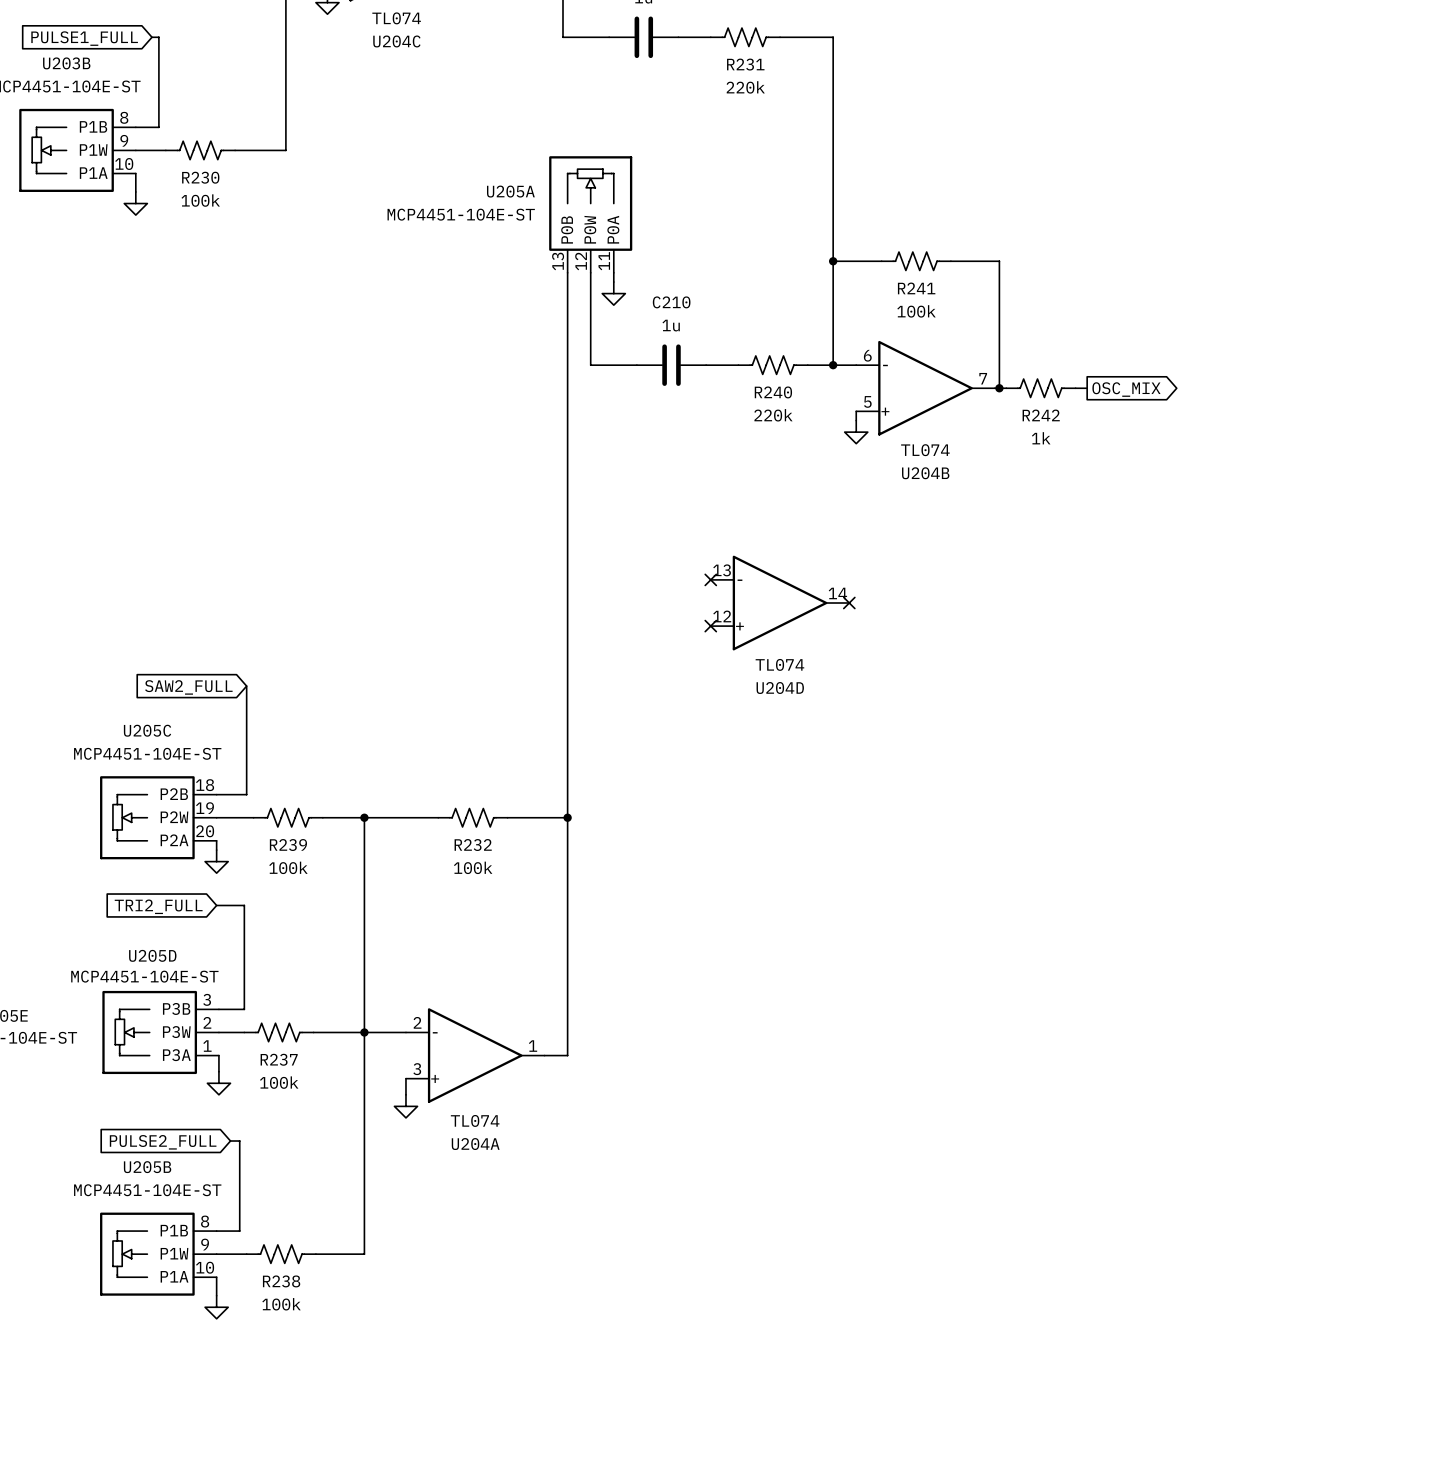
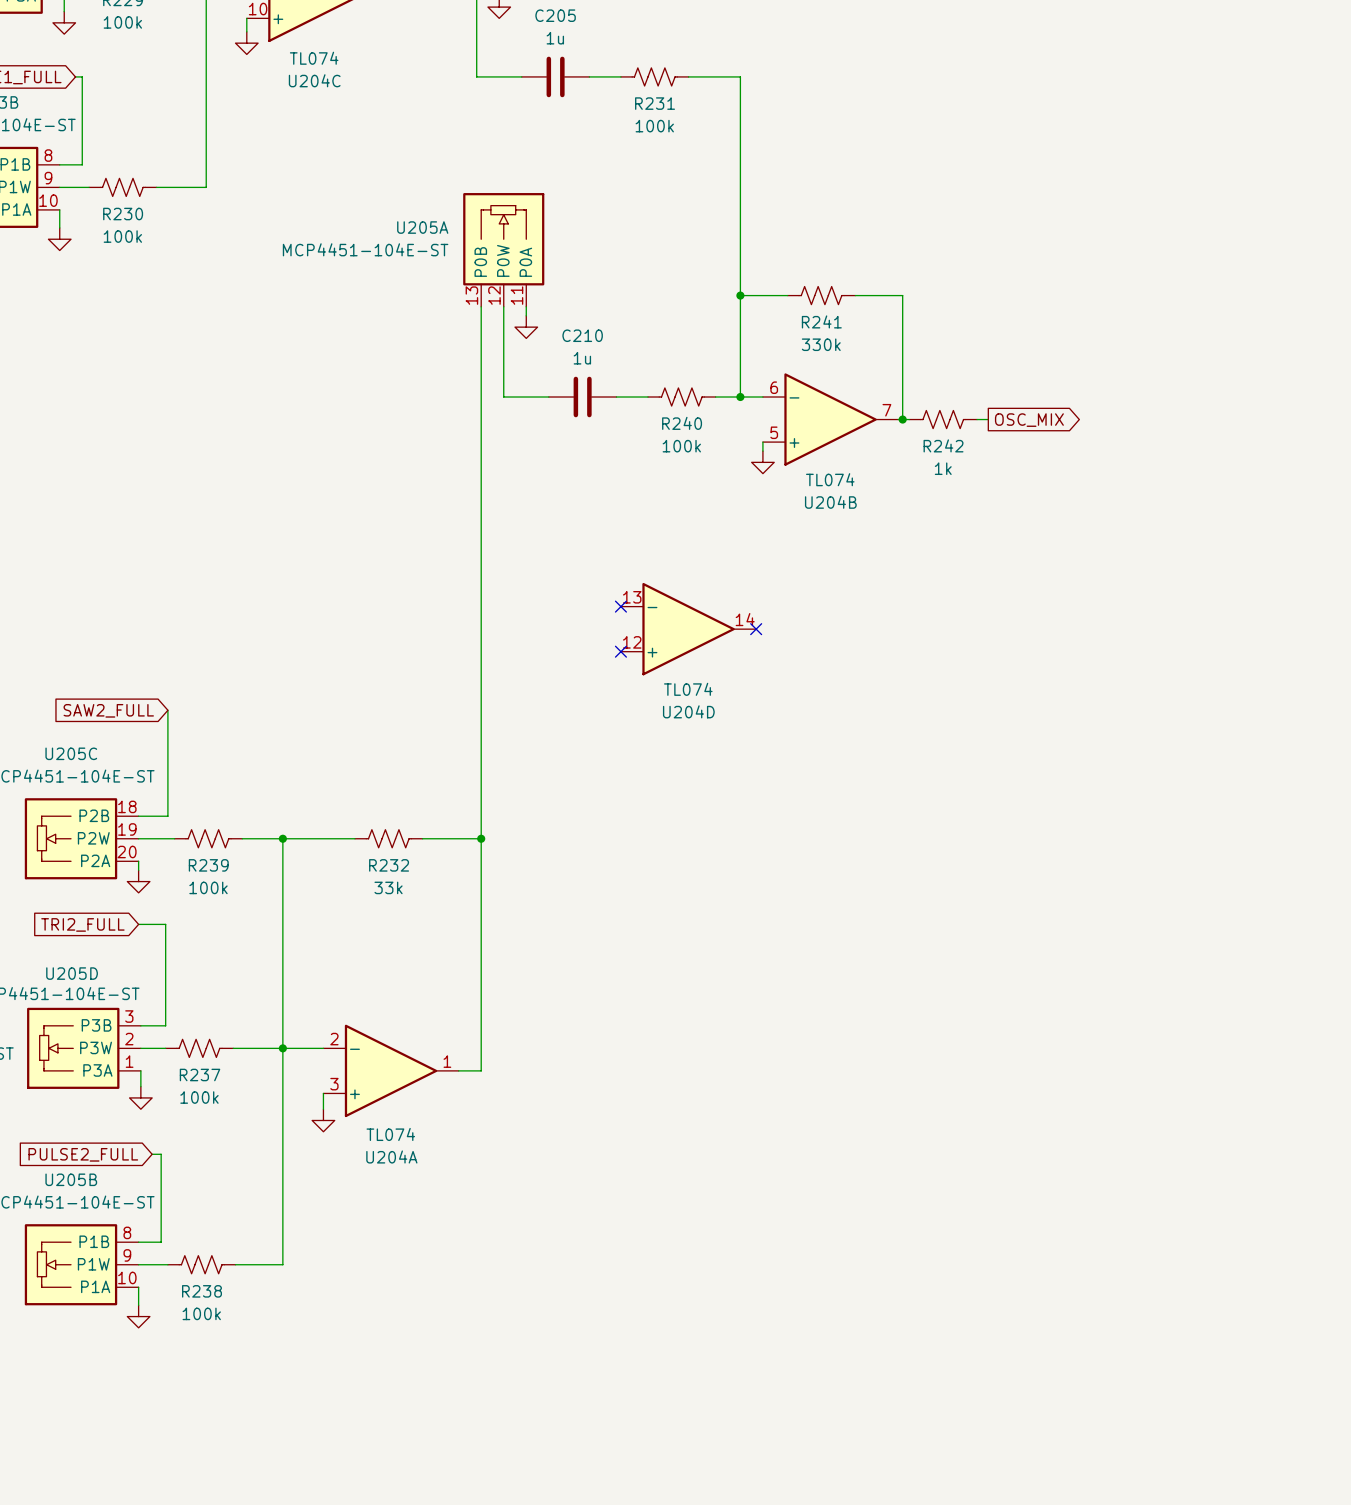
R231 value: 220k (745, 87) -> 100k (654, 126)
R241 value: 100k (916, 311) -> 330k (821, 344)
R240 value: 220k (773, 415) -> 100k (681, 446)
R232 value: 100k (473, 867) -> 33k (388, 887)

